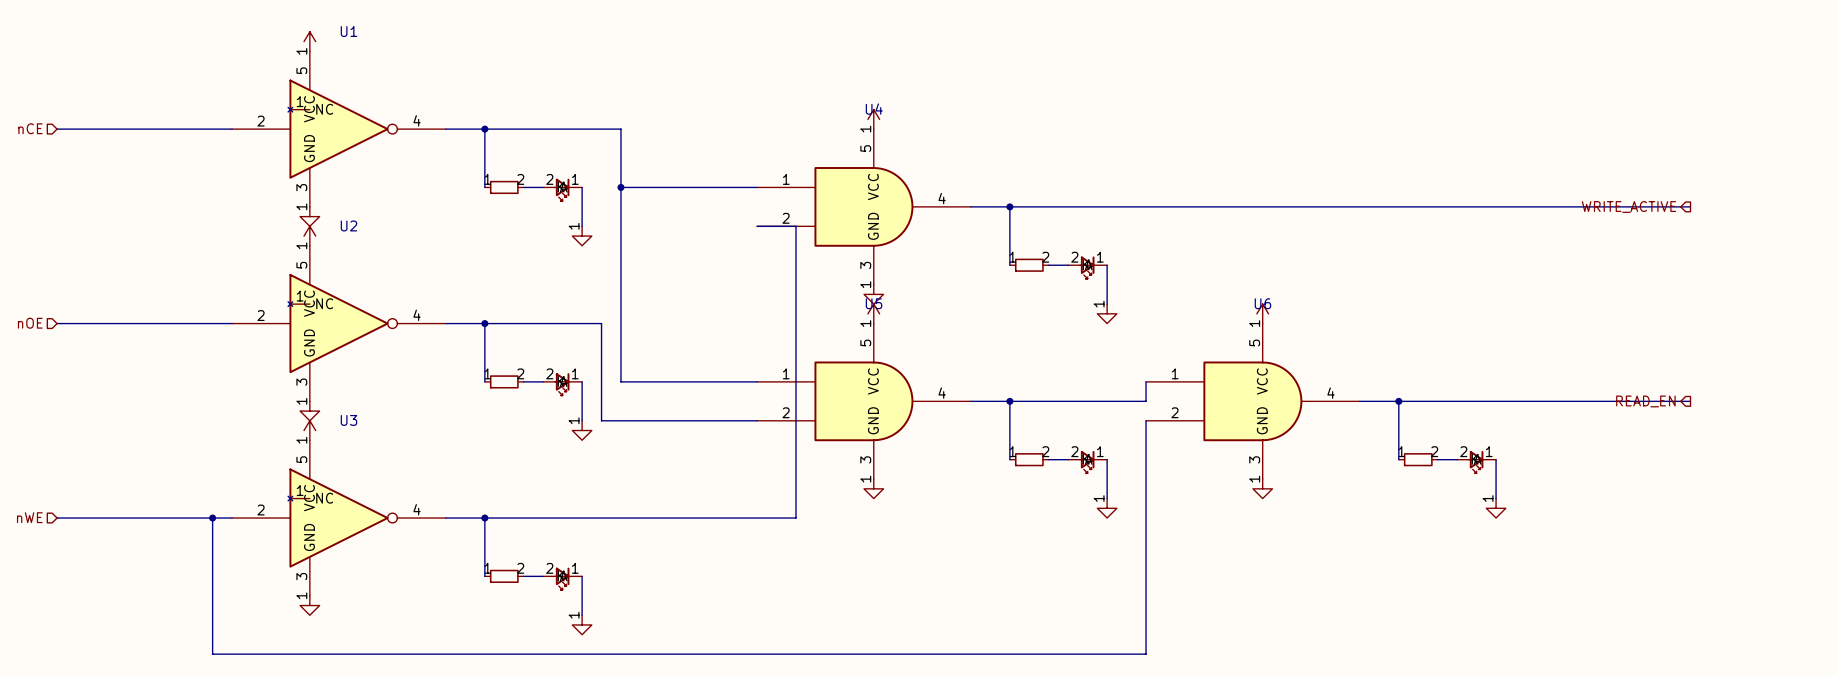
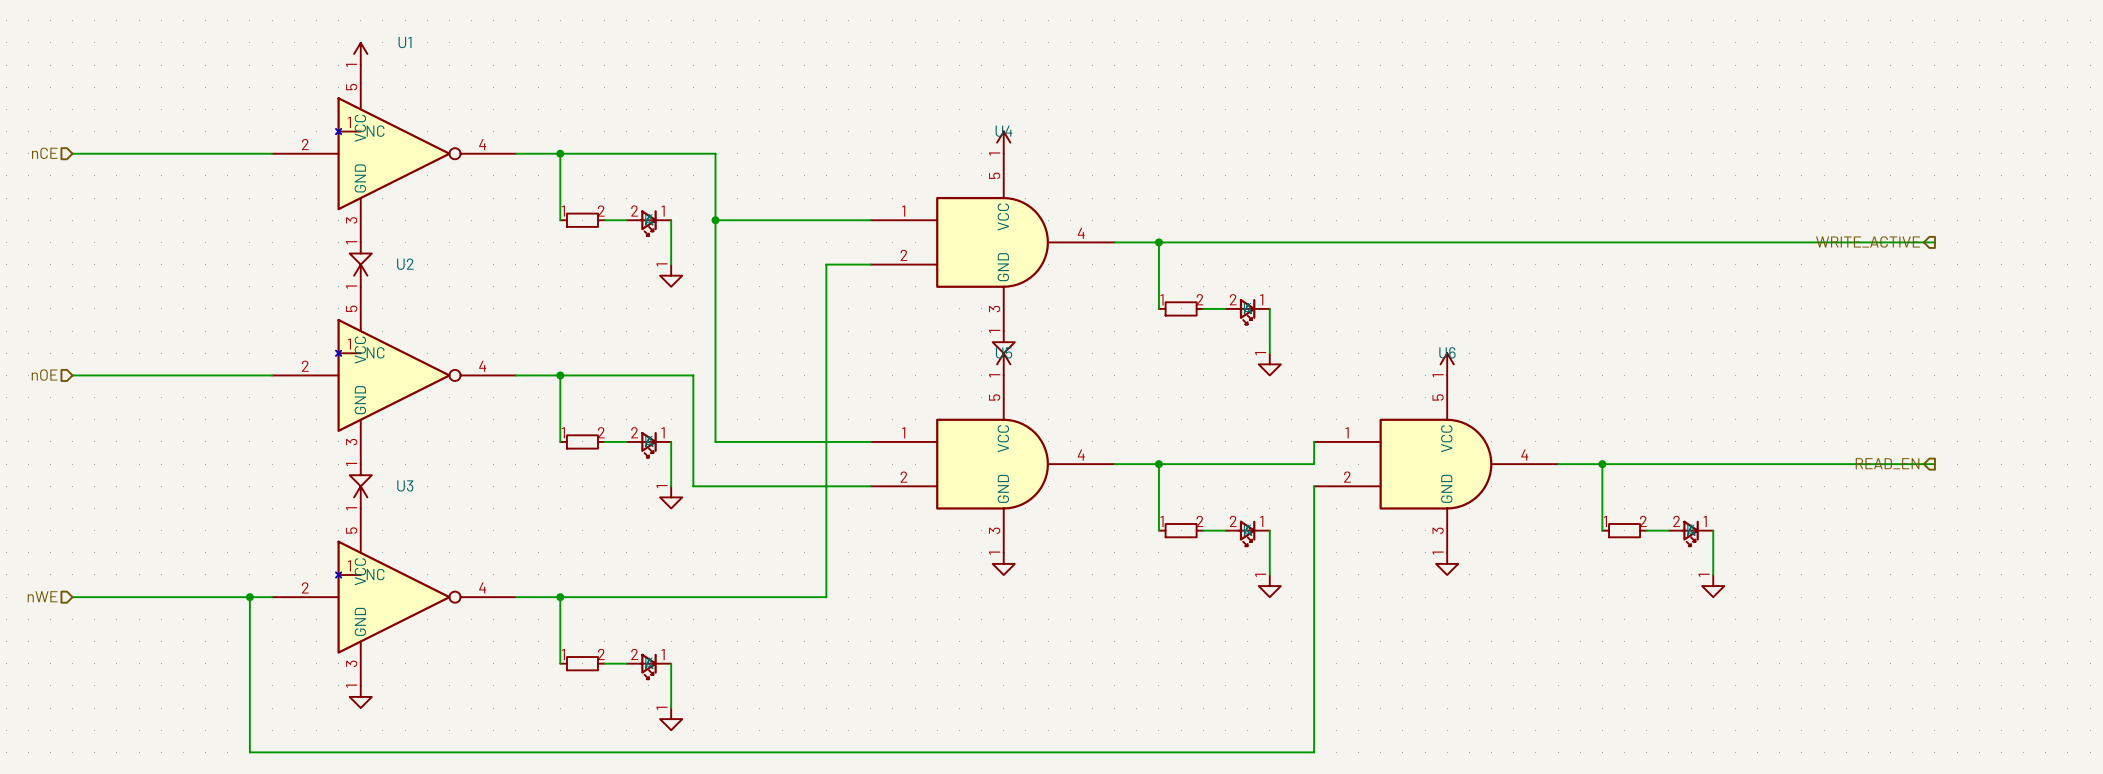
wire: (757, 226) (795, 226) (795, 518) (718, 518) -> (870, 264) (826, 264) (826, 597)

